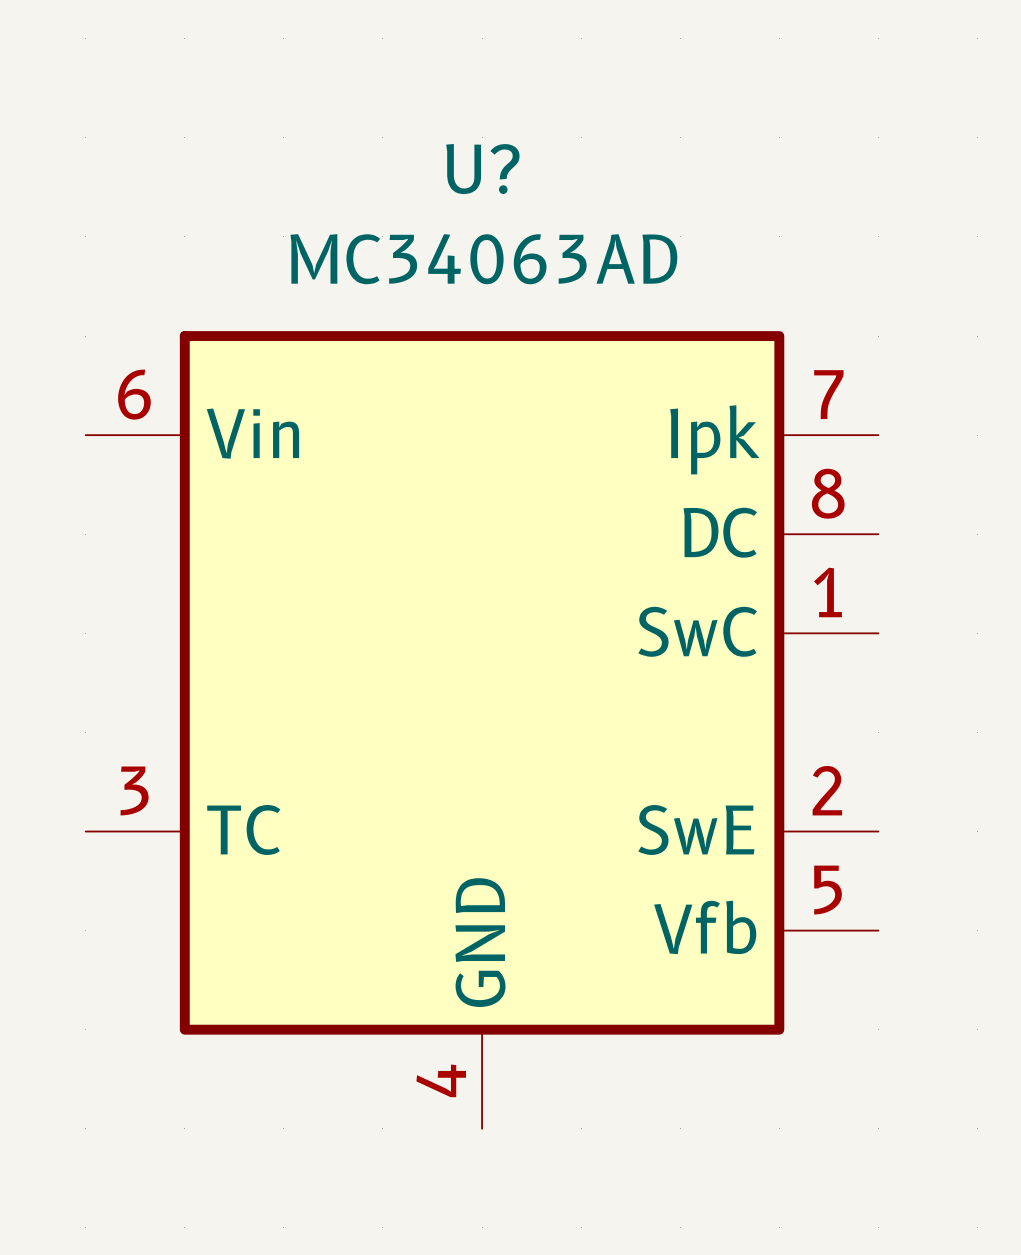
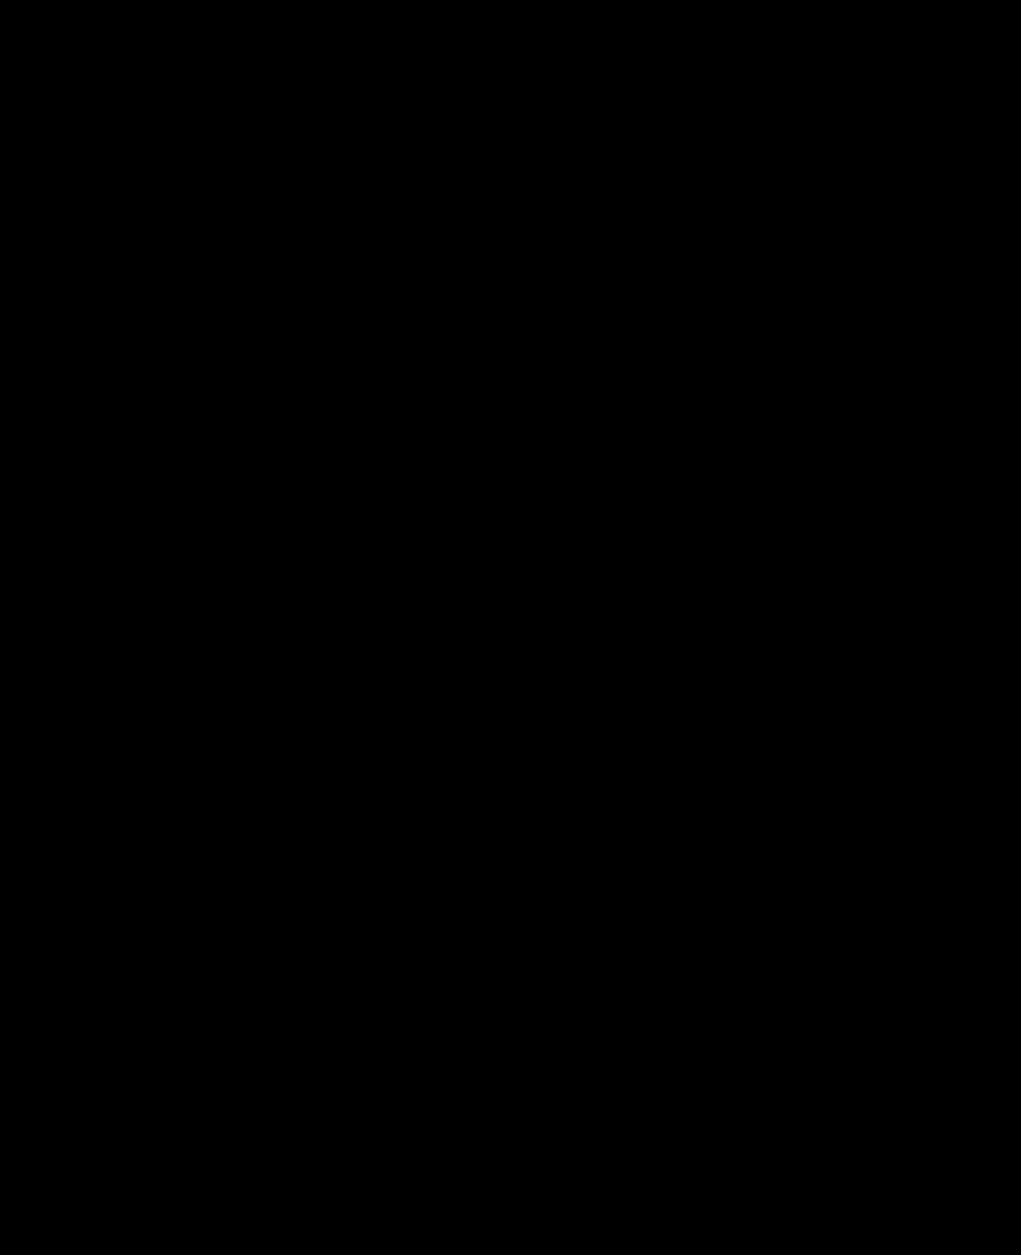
U?: MC34063AD (482, 729) -> none

